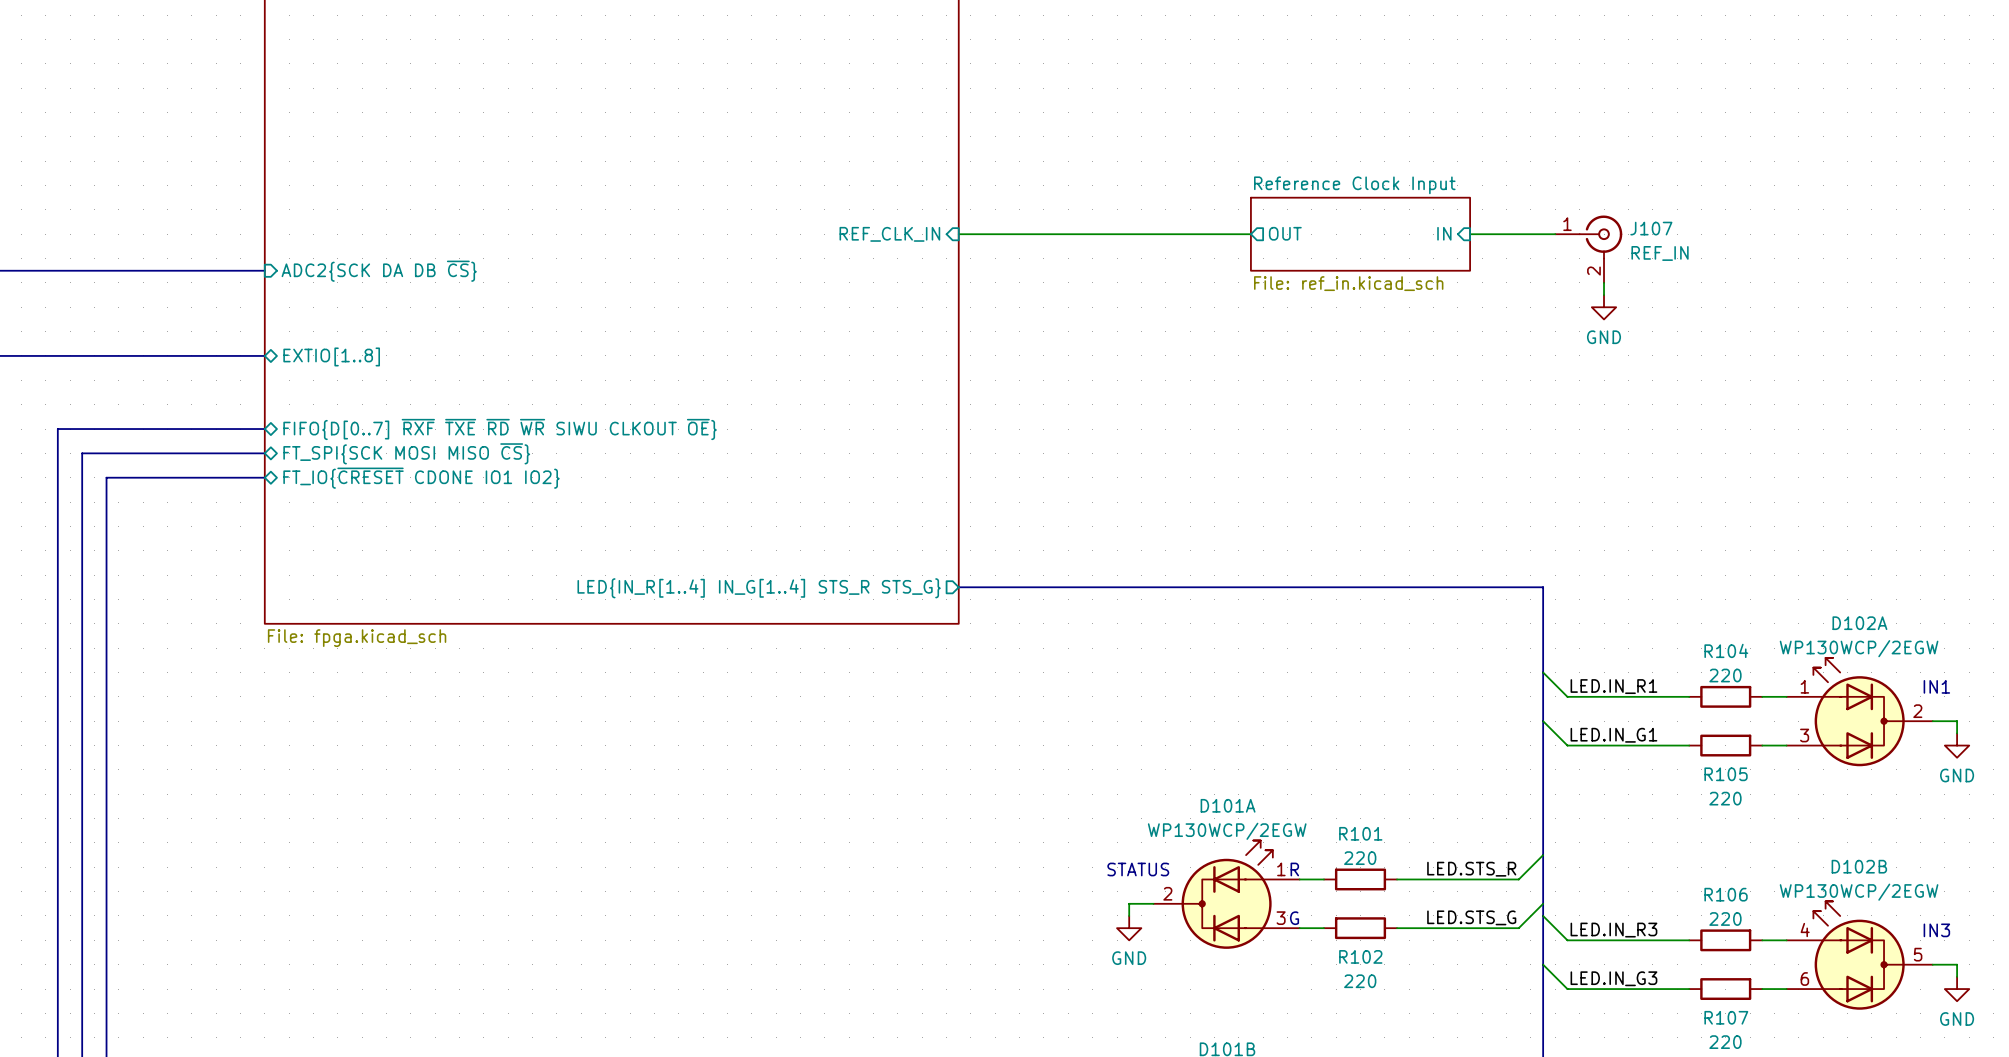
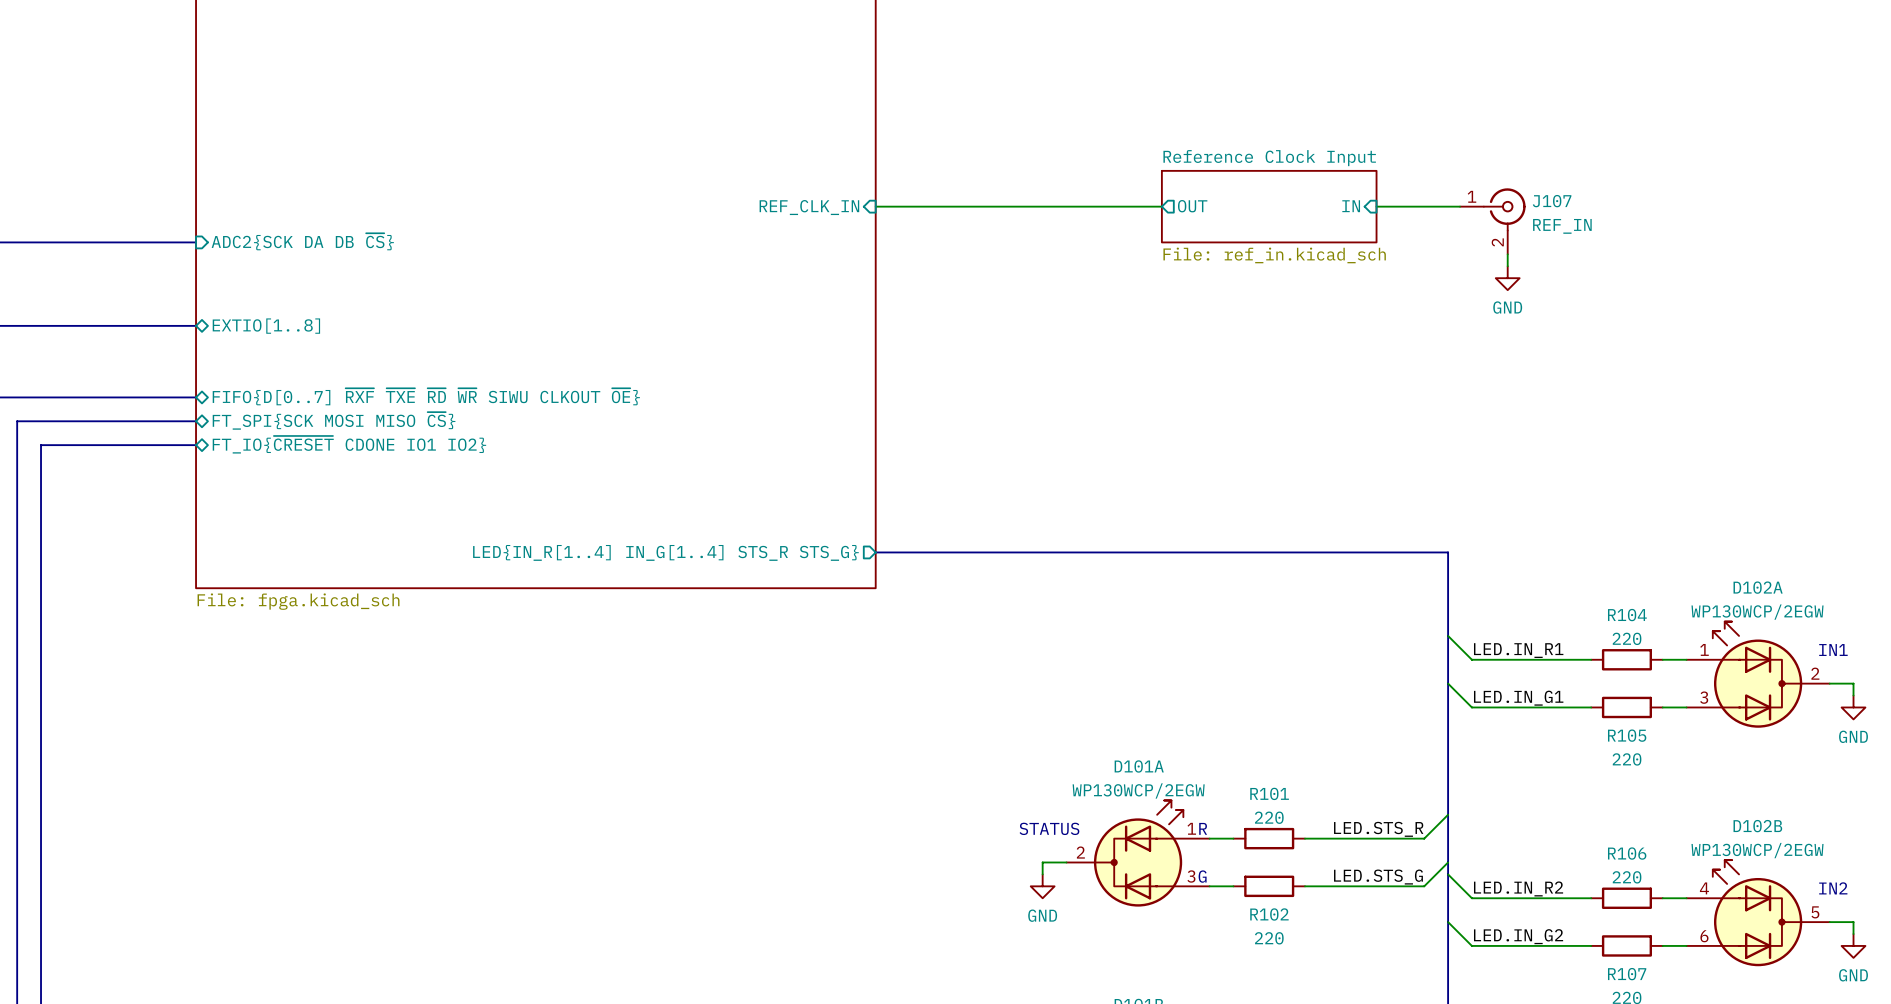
label: LED.IN_R3 (1613, 930) -> LED.IN_R2 (1518, 888)
text: IN3 (1936, 930) -> IN2 (1833, 888)
label: LED.IN_G3 (1613, 978) -> LED.IN_G2 (1518, 936)

